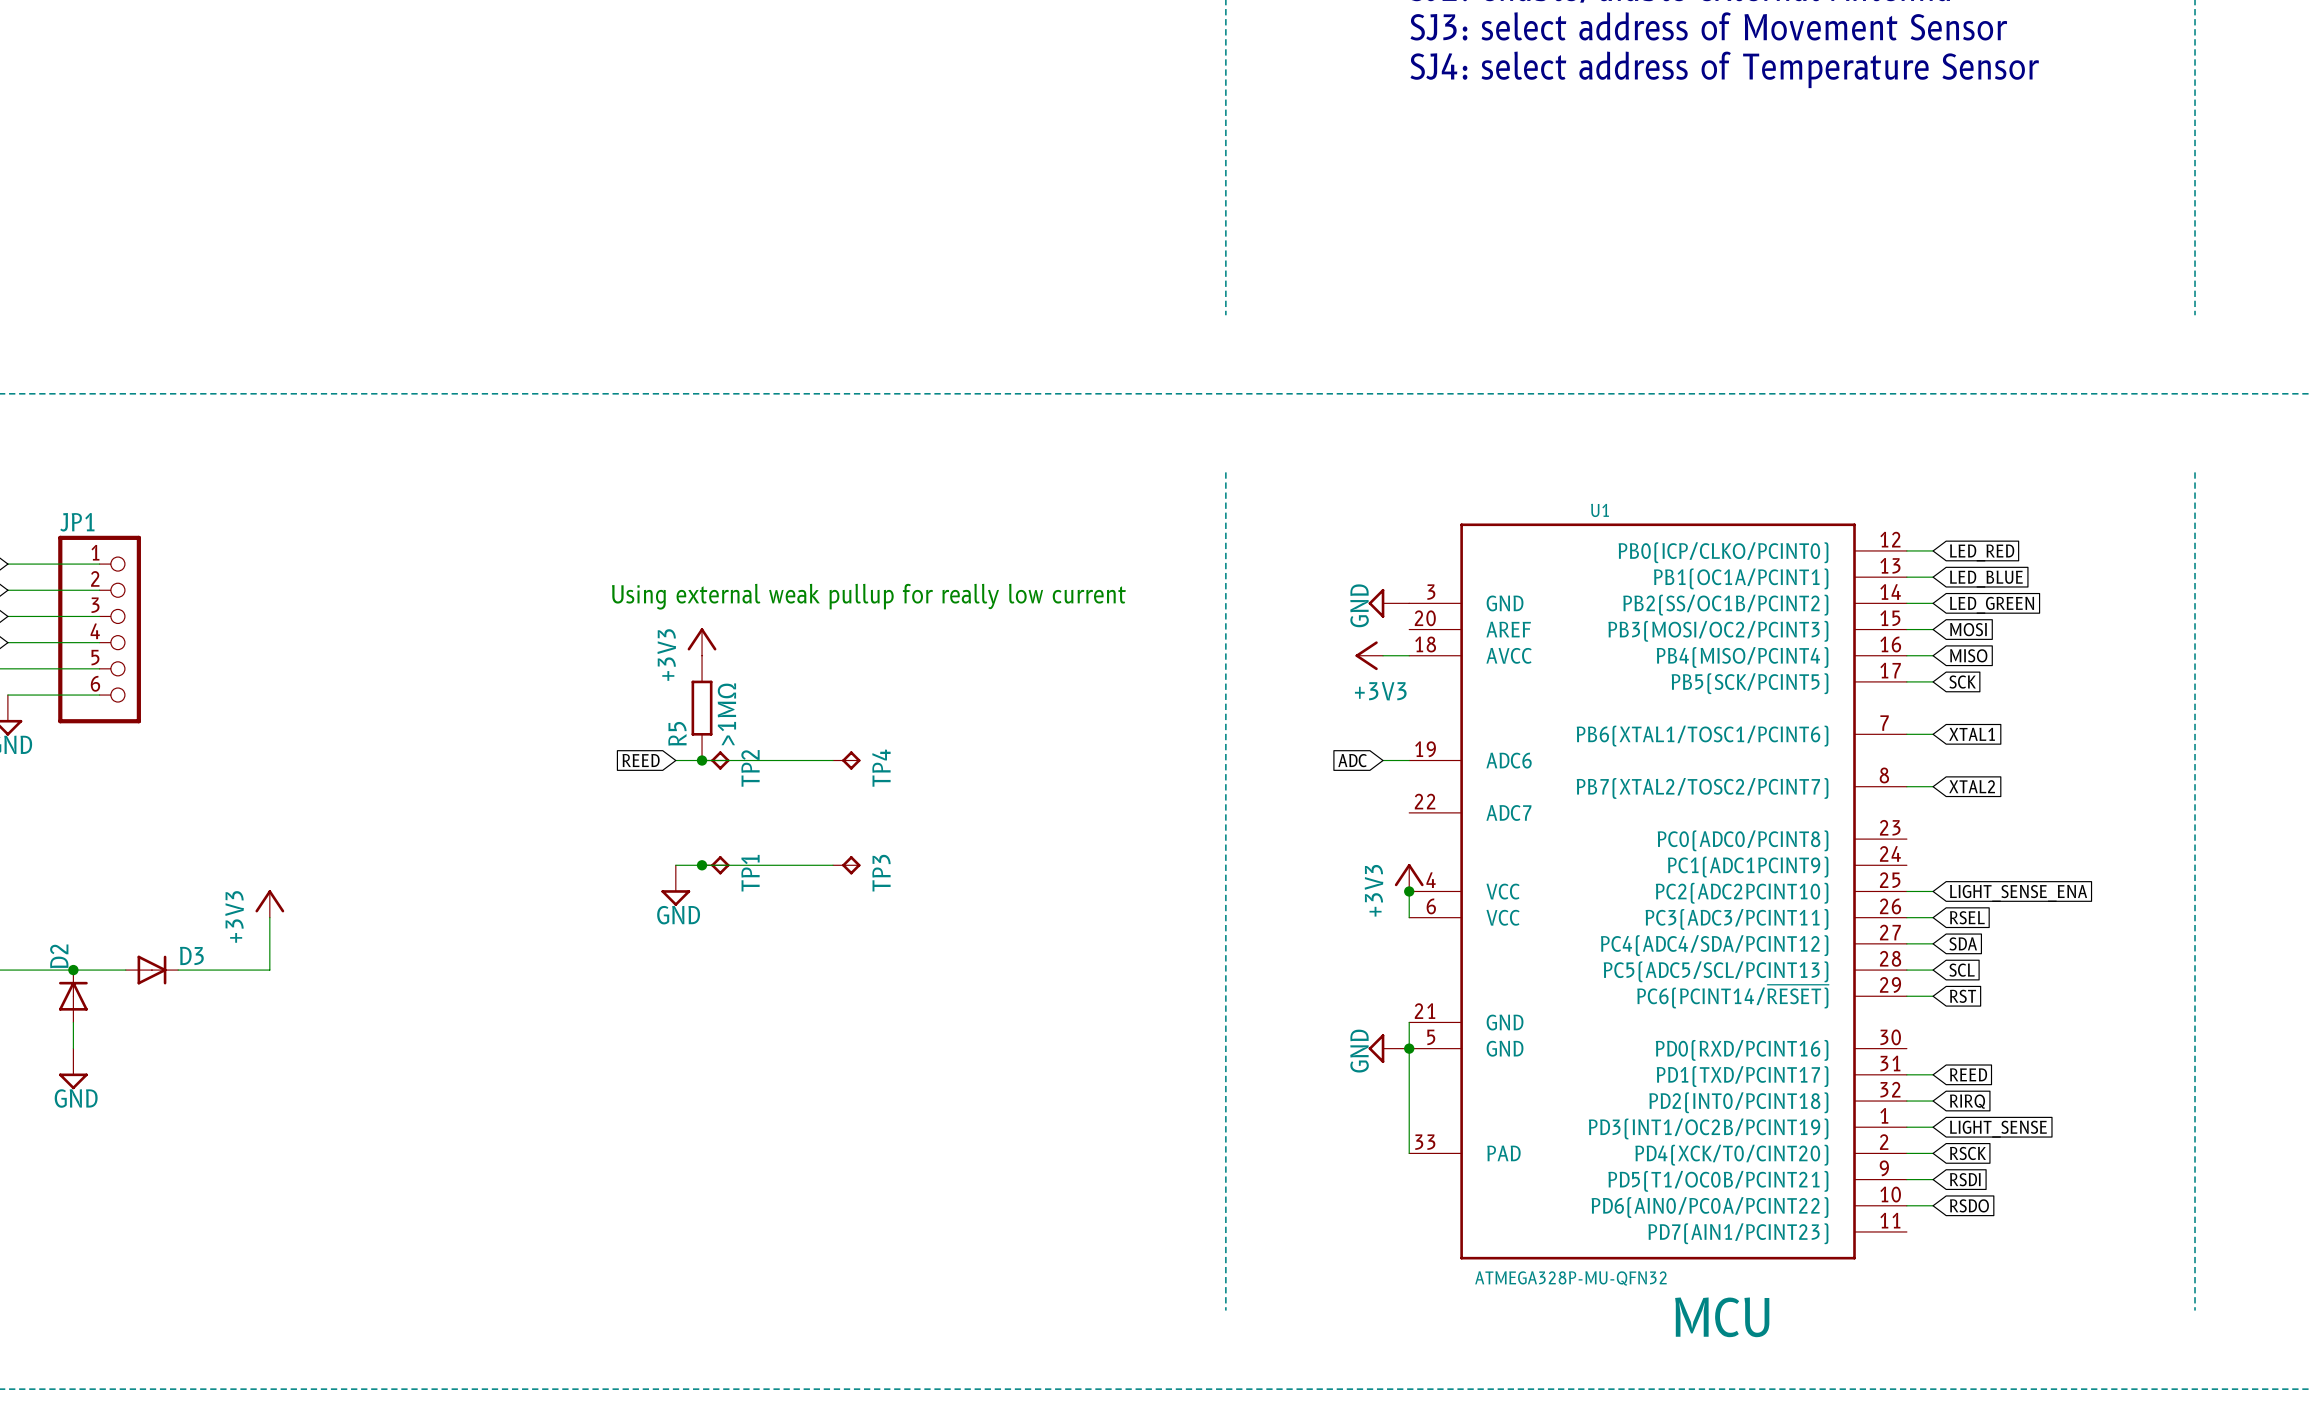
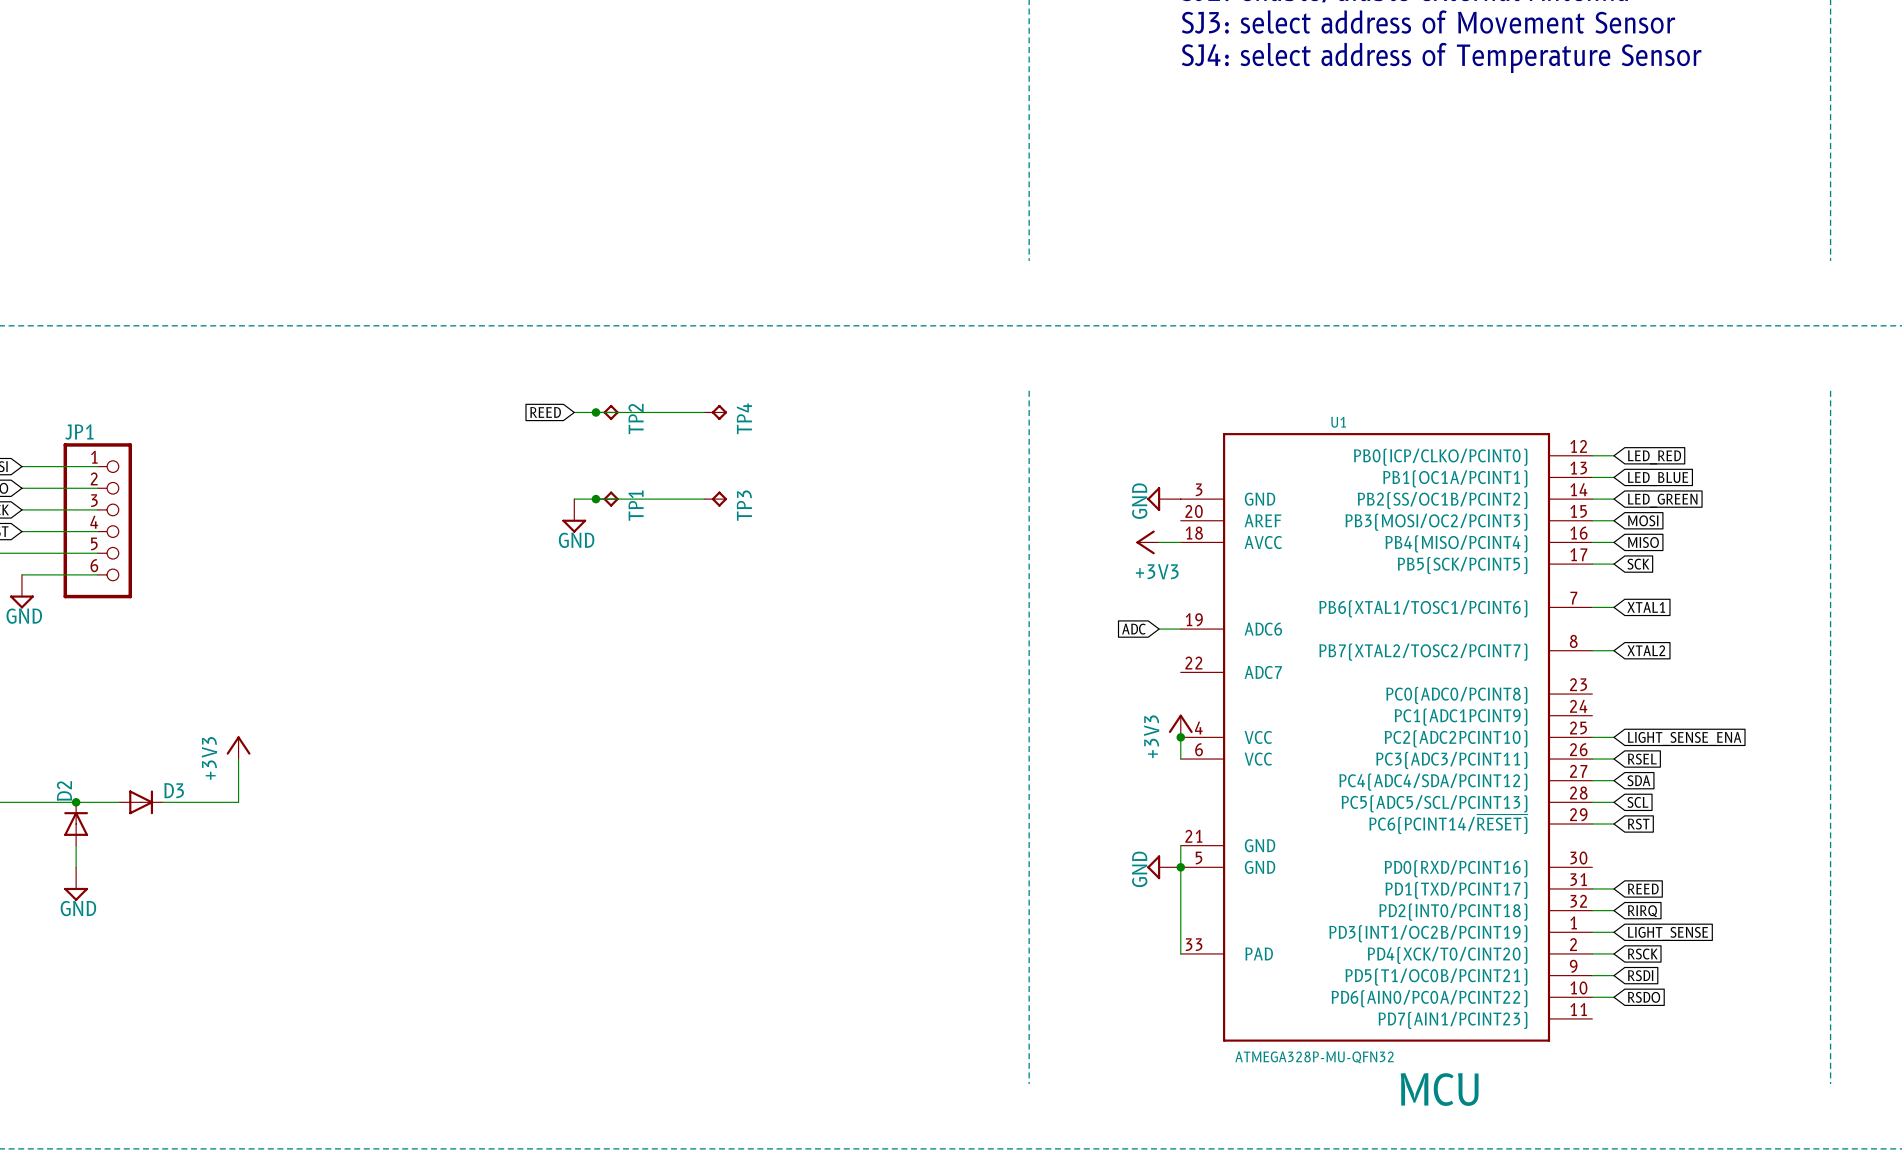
global label: none -> REED (545, 412)
wire: none -> (574, 412) (704, 412)
junction: none -> (595, 412)
text: Using external weak pullup for really low current (868, 596) -> none
junction: none -> (595, 499)
power symbol: none -> GND (574, 515)
power symbol: +3V3 (702, 641) -> none
R5: >1MΩ (702, 708) -> none
global label: REED (641, 760) -> none
wire: (675, 760) (832, 760) -> (574, 499) (704, 499)
junction: (702, 760) -> none
TP2 position: (715, 760) -> (607, 412)
TP4 position: (846, 760) -> (715, 412)
wire: (675, 865) (832, 865) -> none
junction: (702, 865) -> none
TP1 position: (715, 865) -> (607, 499)
TP3 position: (846, 865) -> (715, 499)
power symbol: GND (675, 885) -> none

